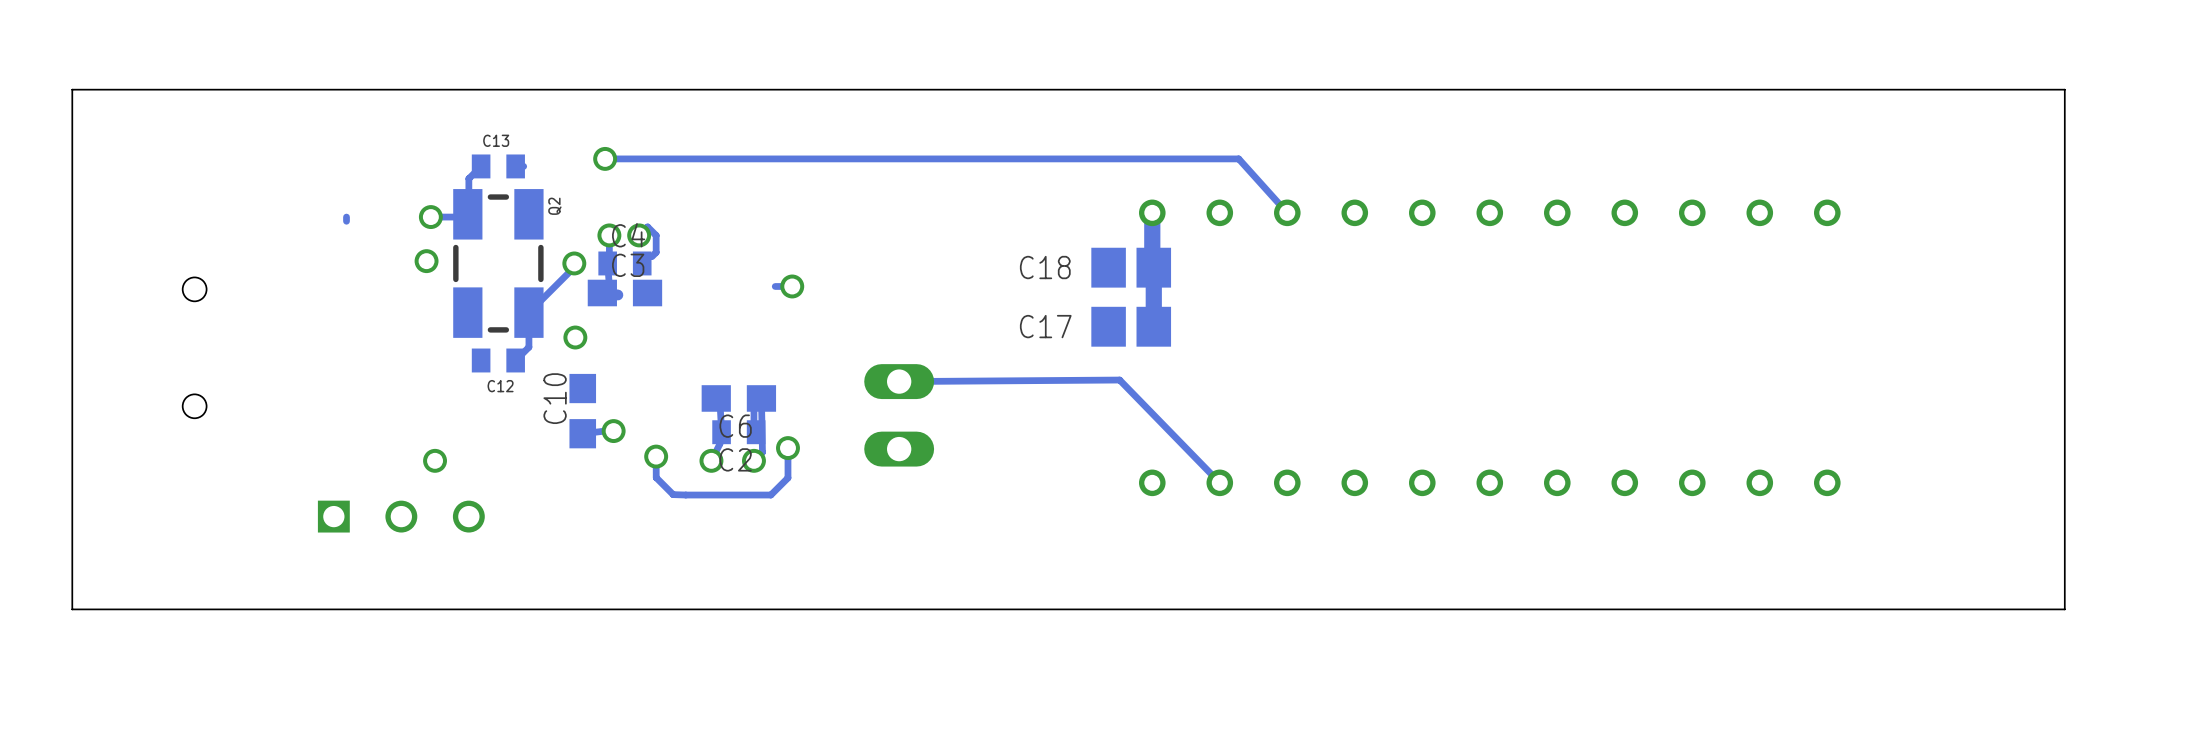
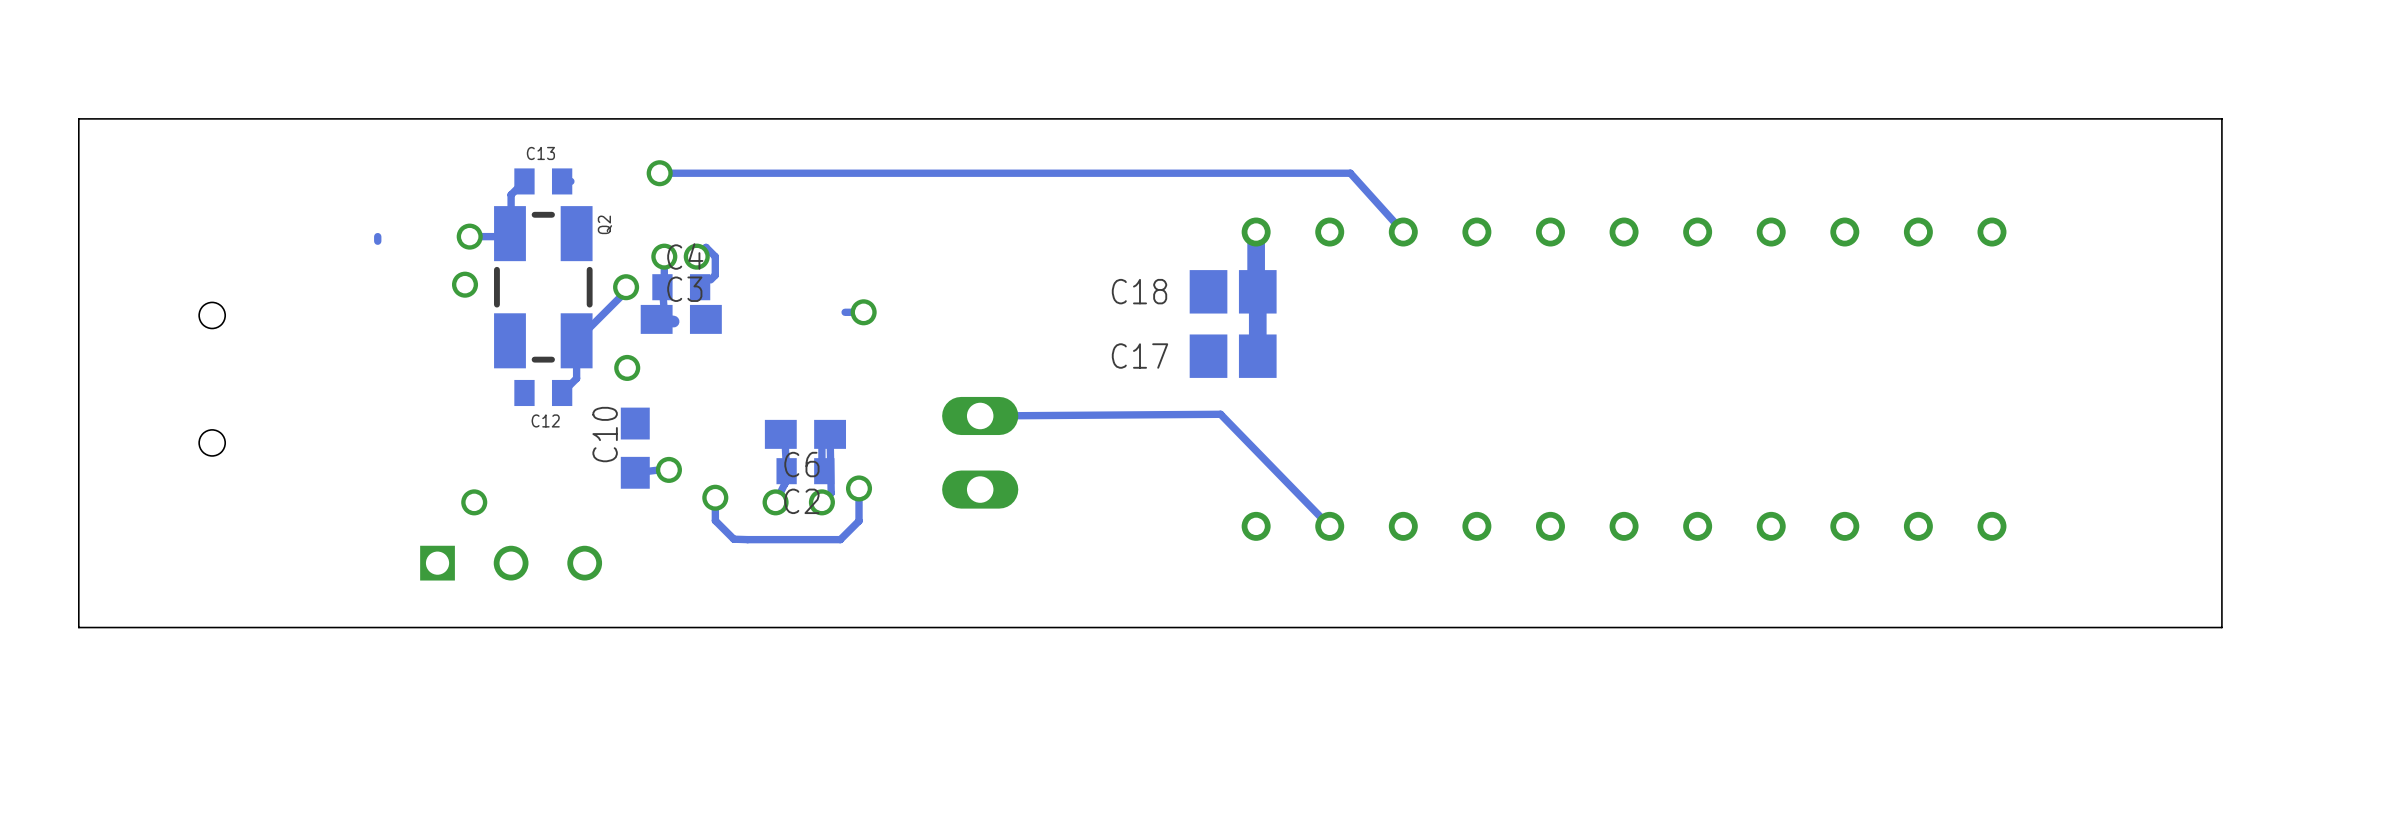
board edge: (72, 109) (72, 89) (2064, 89) (2064, 609) (72, 609) (72, 575) -> (78, 118) (2221, 118) (2221, 627) (78, 627)
part position: (401, 516) -> (511, 563)

